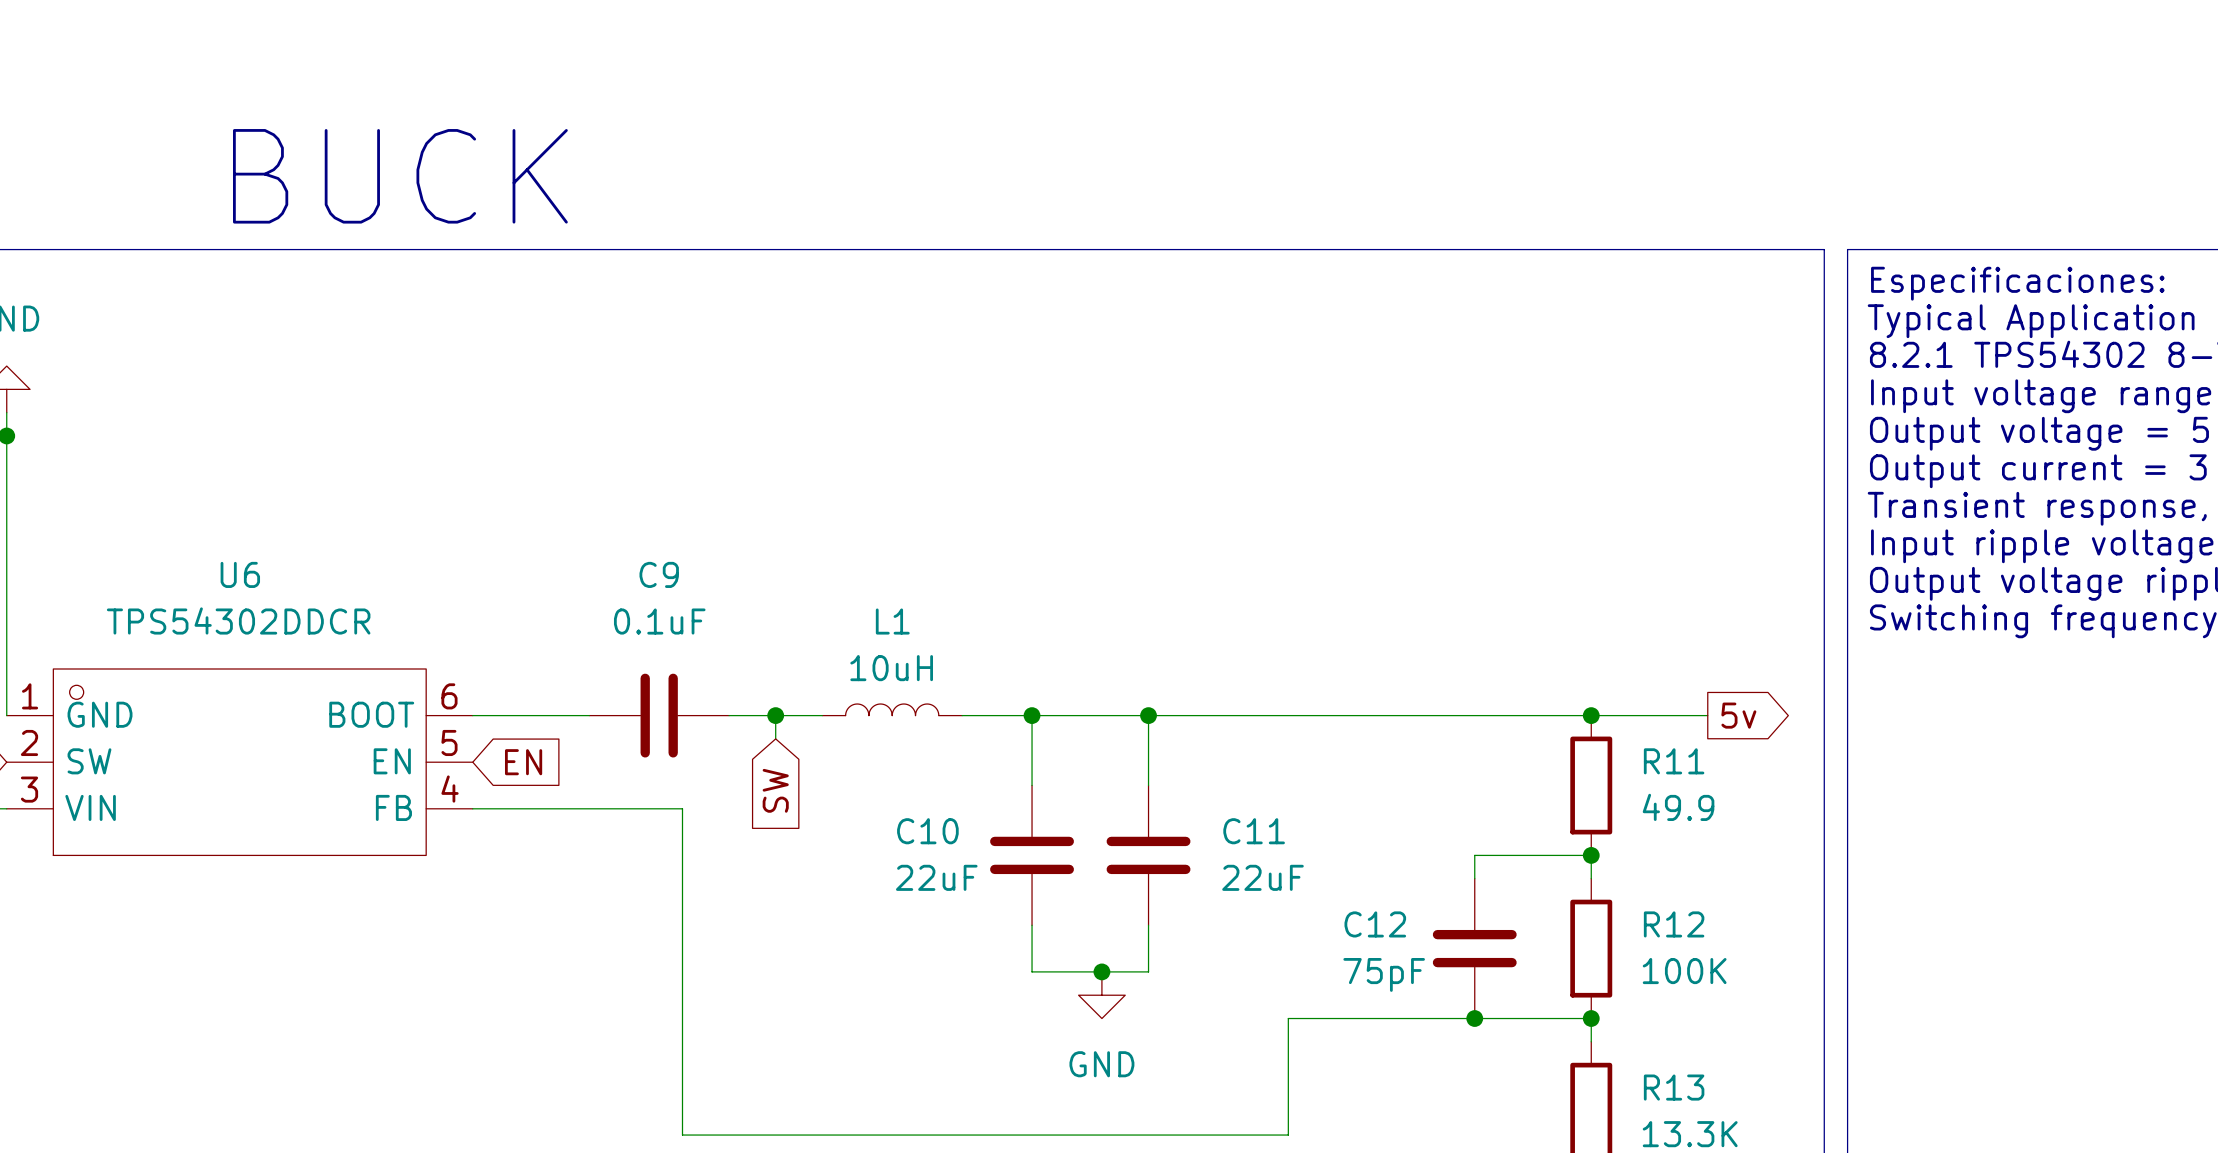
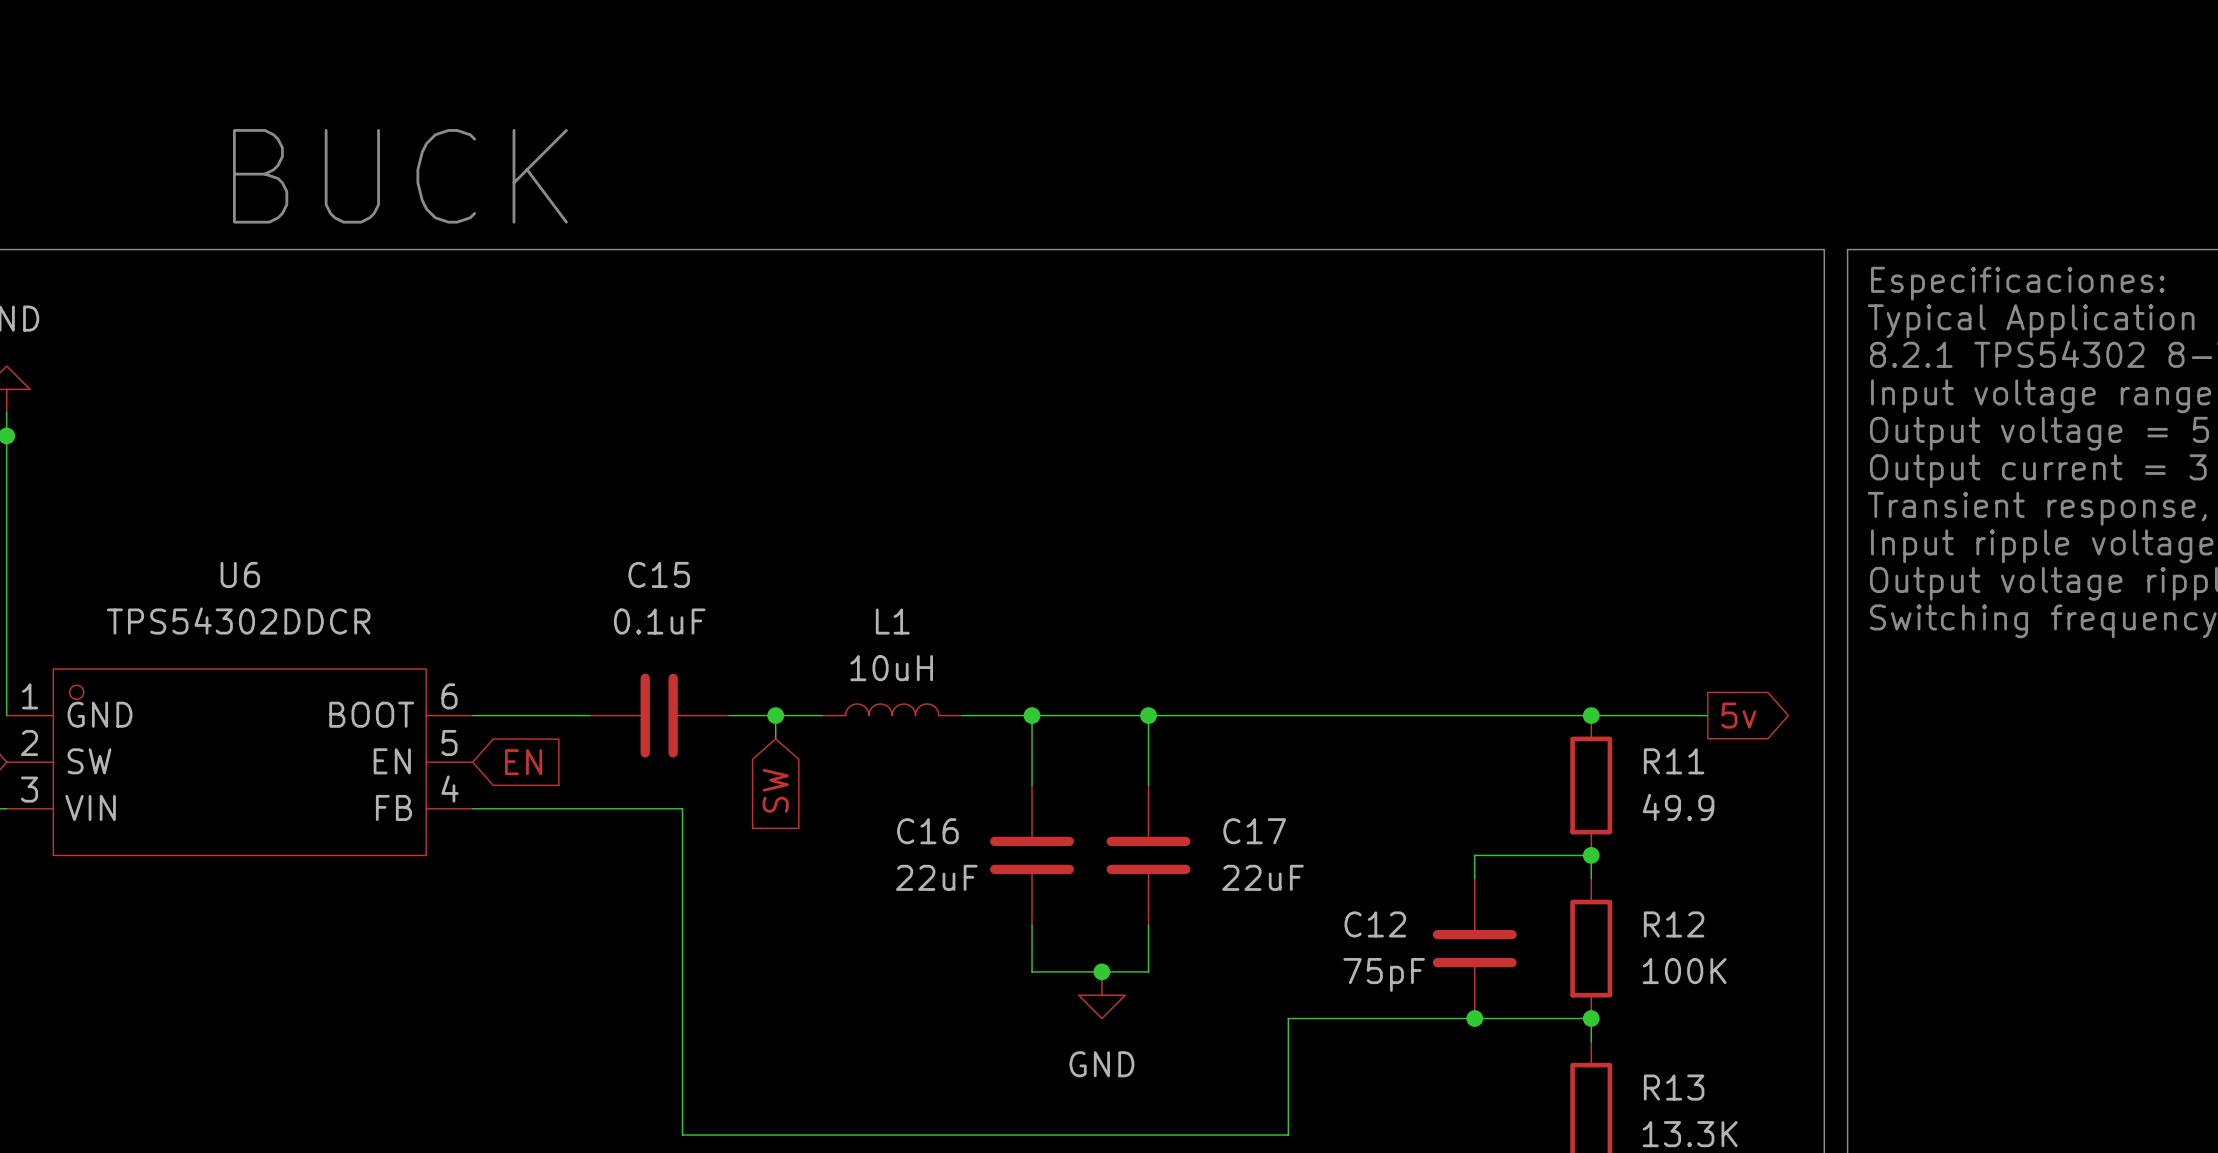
C9 name: C9 (659, 574) -> C15 (659, 574)
C10 name: C10 (927, 831) -> C16 (927, 831)
C11 name: C11 (1254, 831) -> C17 (1254, 831)

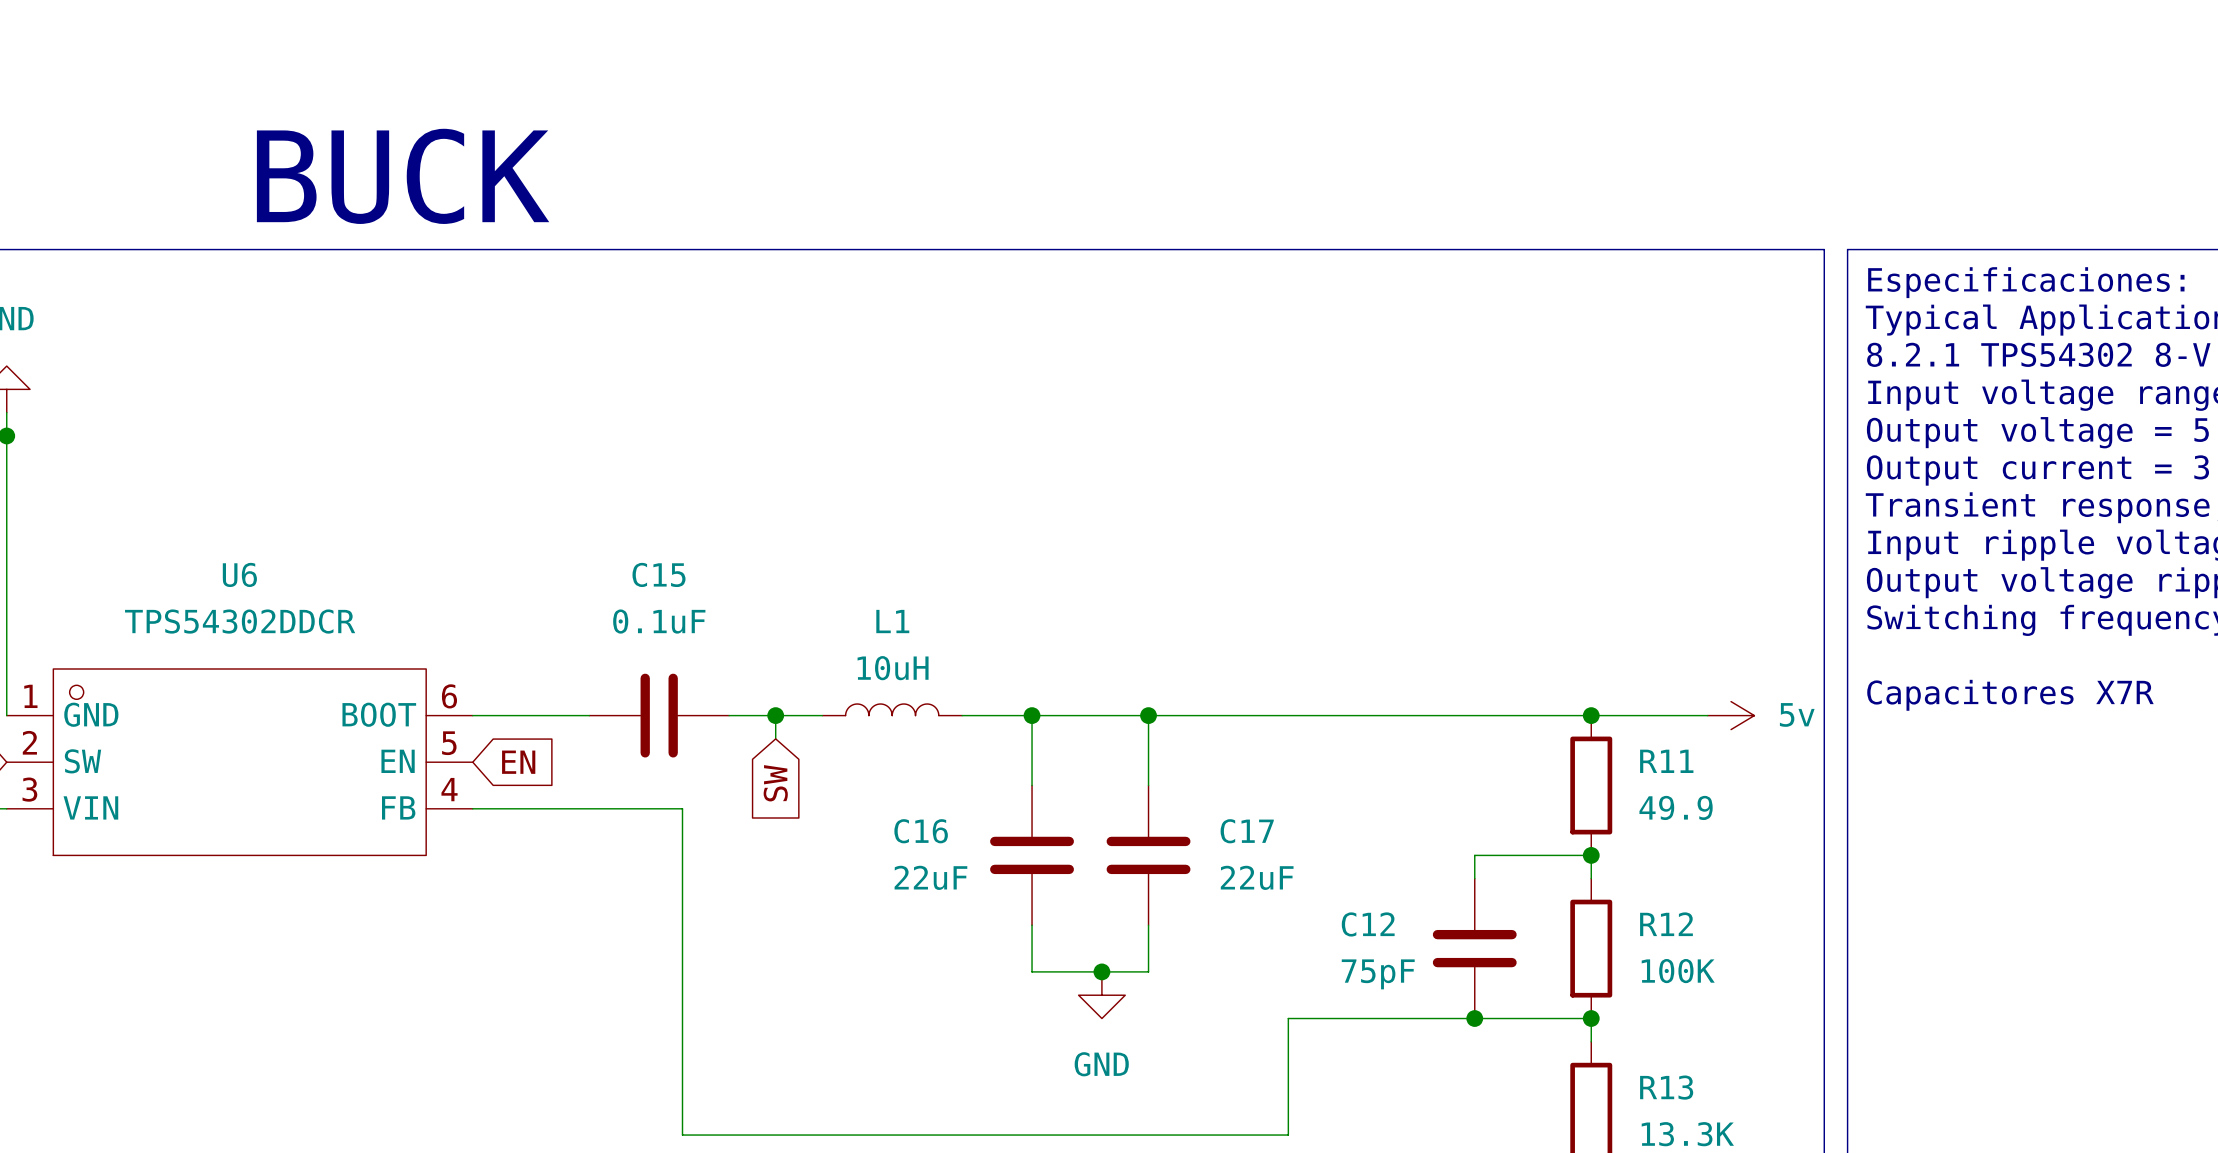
text: none -> Capacitores X7R (2010, 695)
power symbol: none -> 5v (1731, 715)
global label: 5v (1738, 715) -> none

